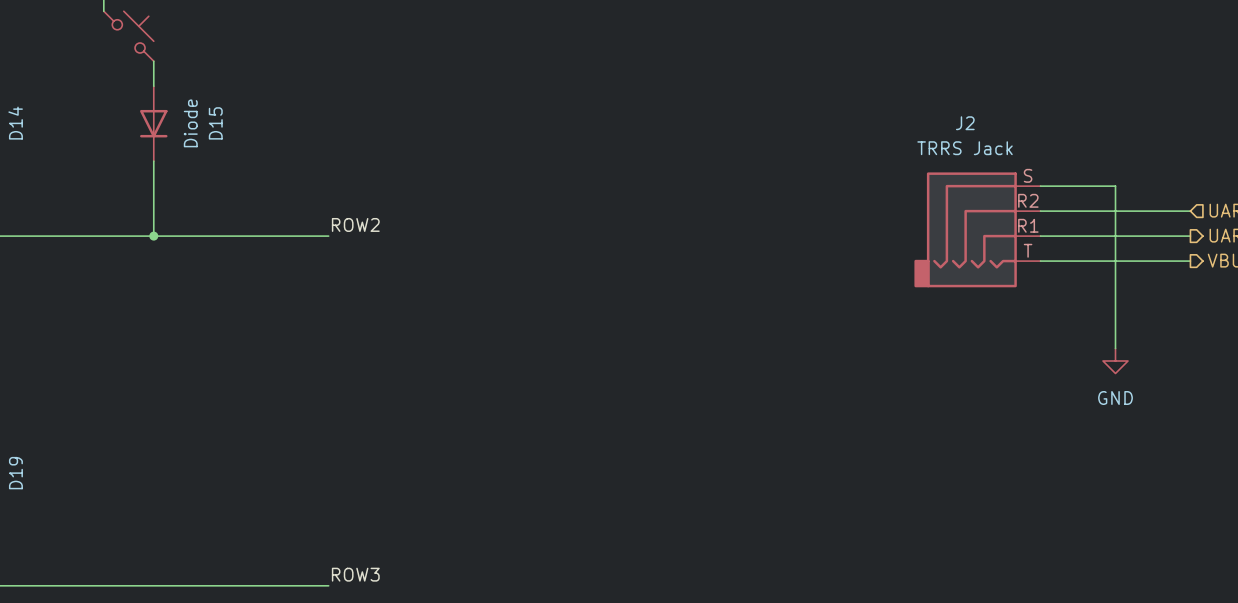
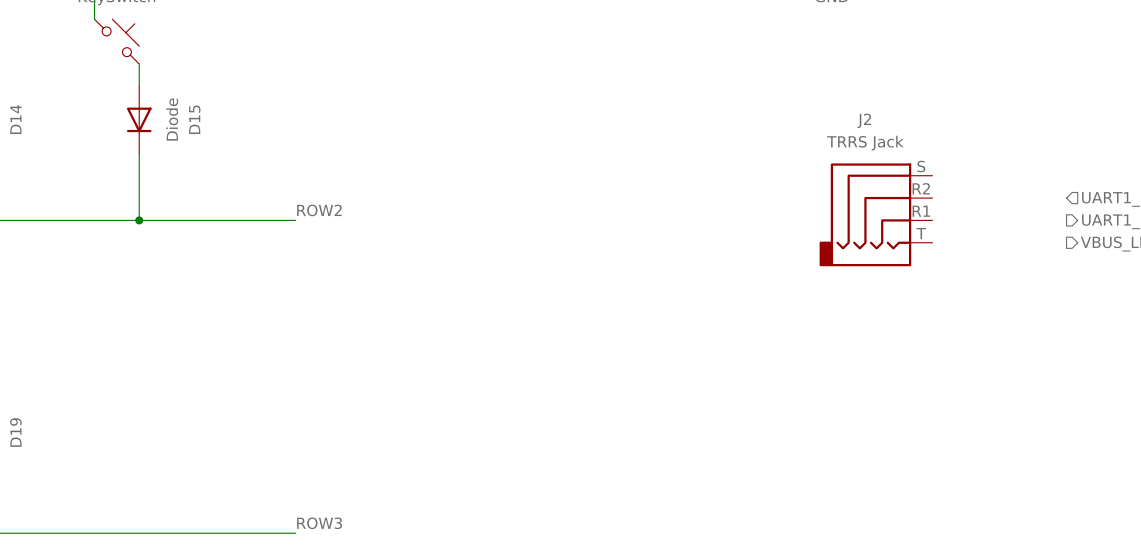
wire: (1040, 186) (1115, 186) (1115, 348) -> none
wire: (1040, 211) (1190, 211) -> none
wire: (1040, 236) (1190, 236) -> none
wire: (1040, 261) (1190, 261) -> none
power symbol: GND (1115, 361) -> none

